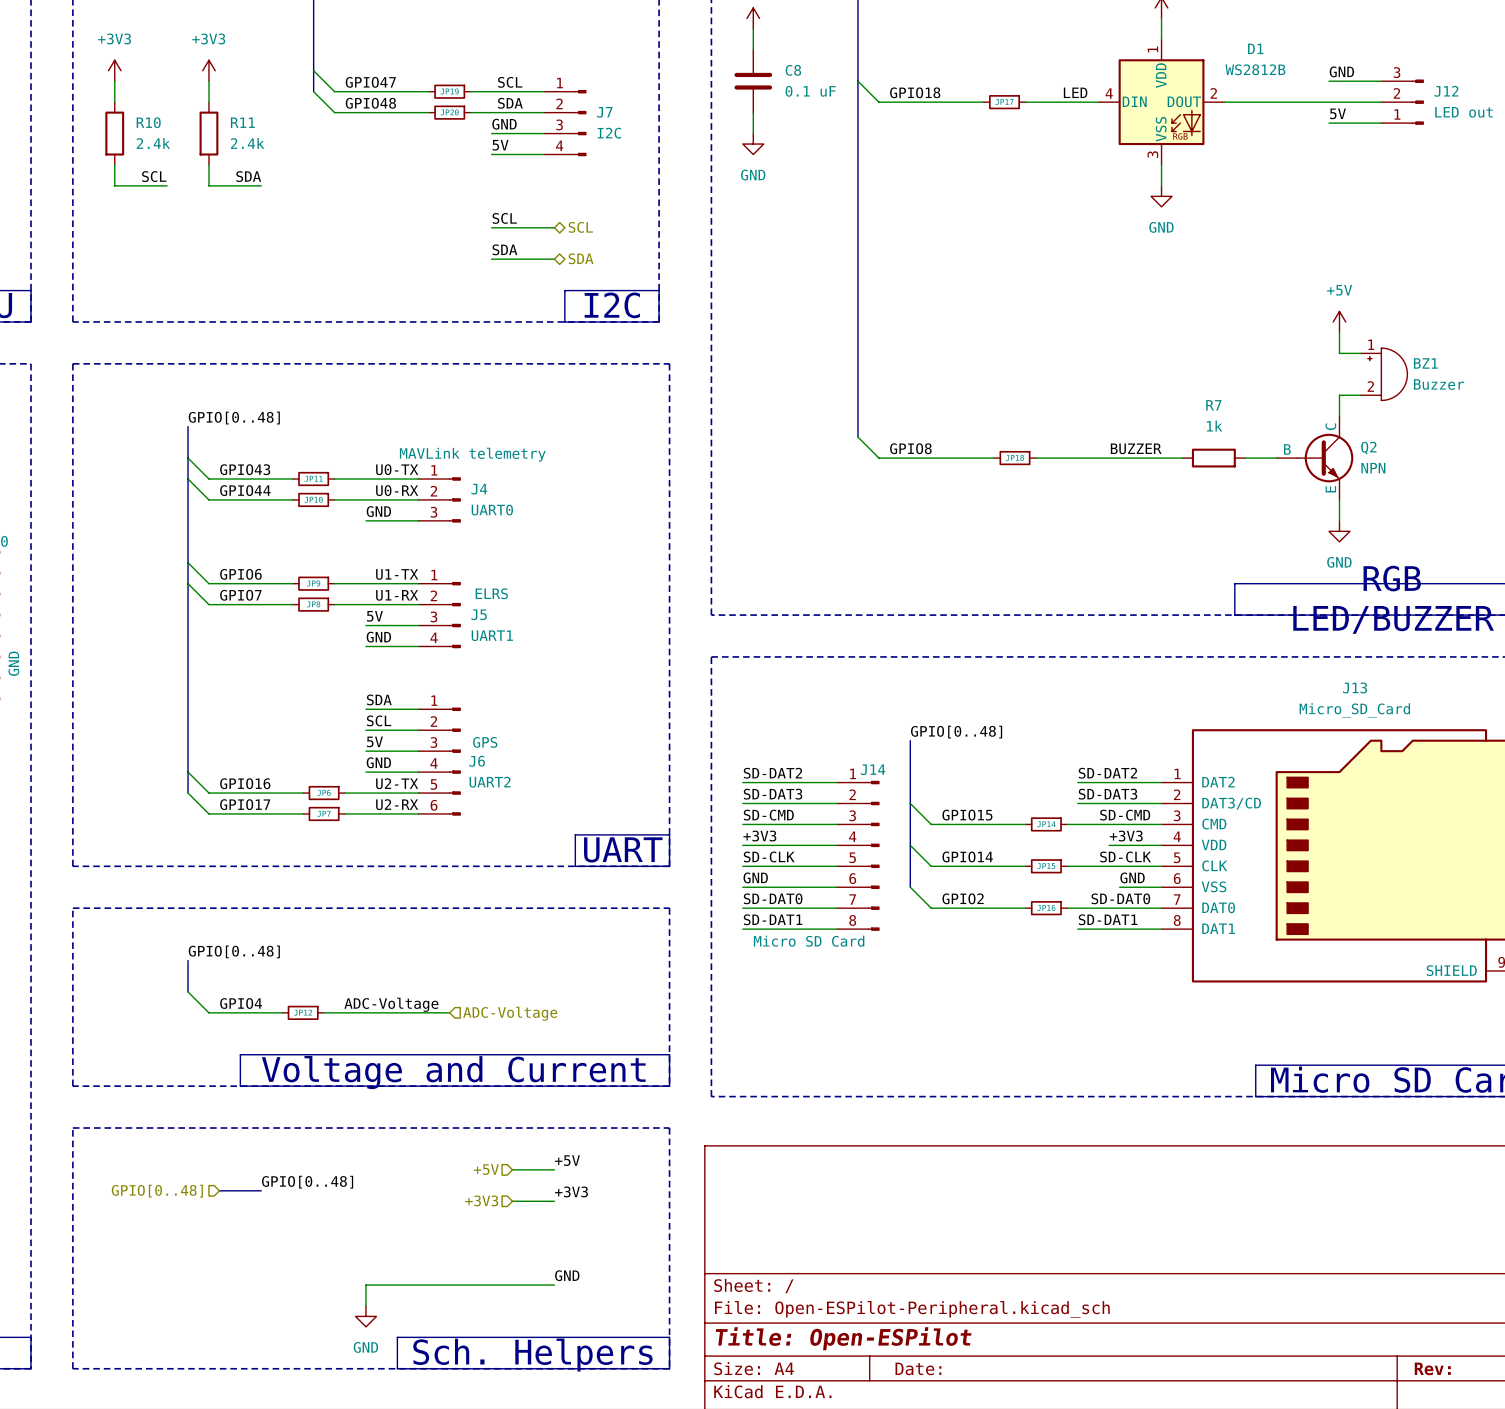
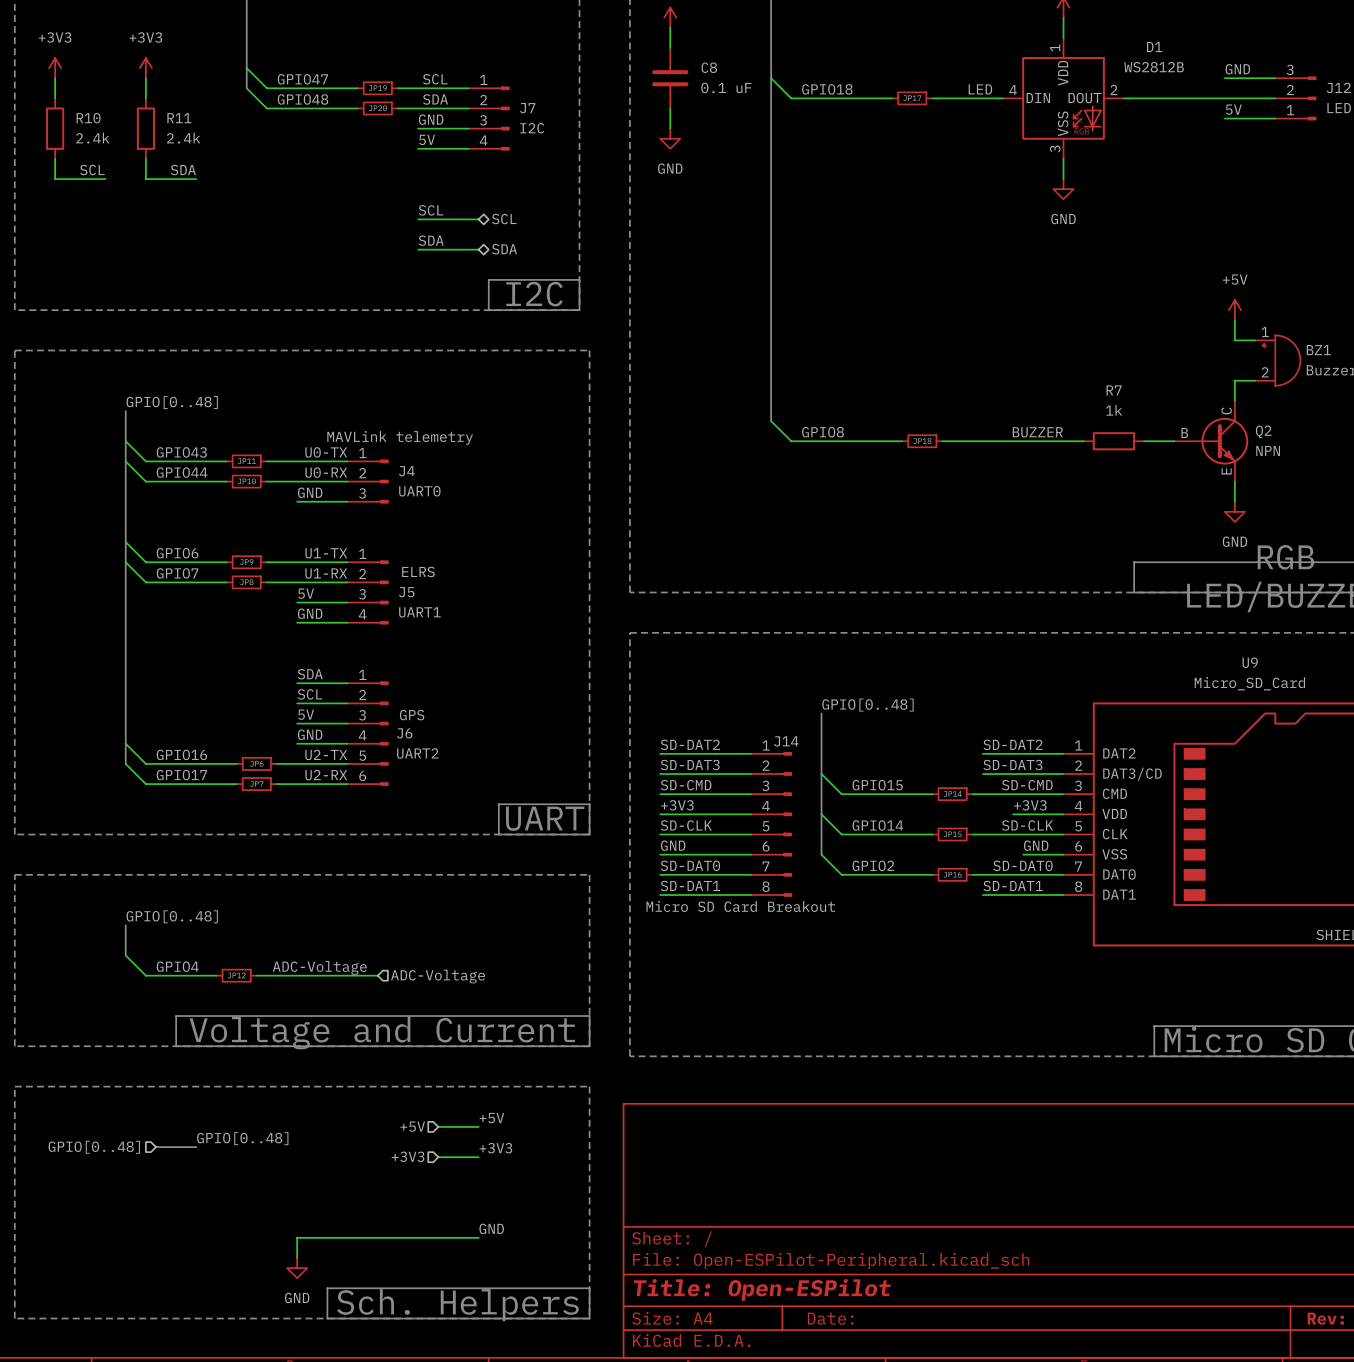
J13 name: J13 (1355, 687) -> U9 (1250, 662)
J14 value: Micro SD Card (809, 941) -> Micro SD Card Breakout (740, 906)

